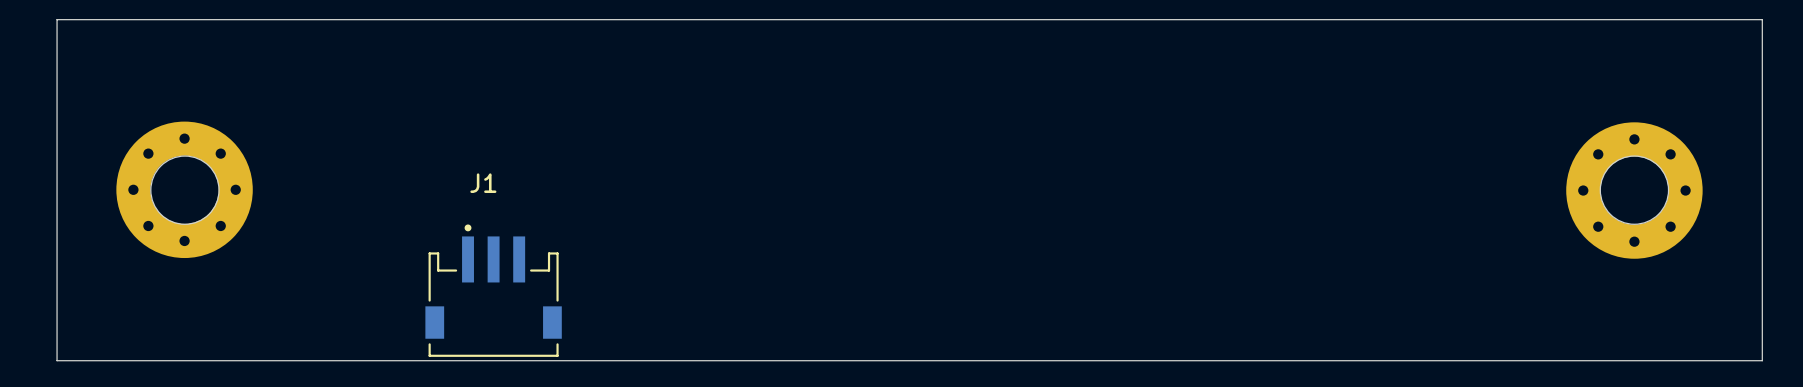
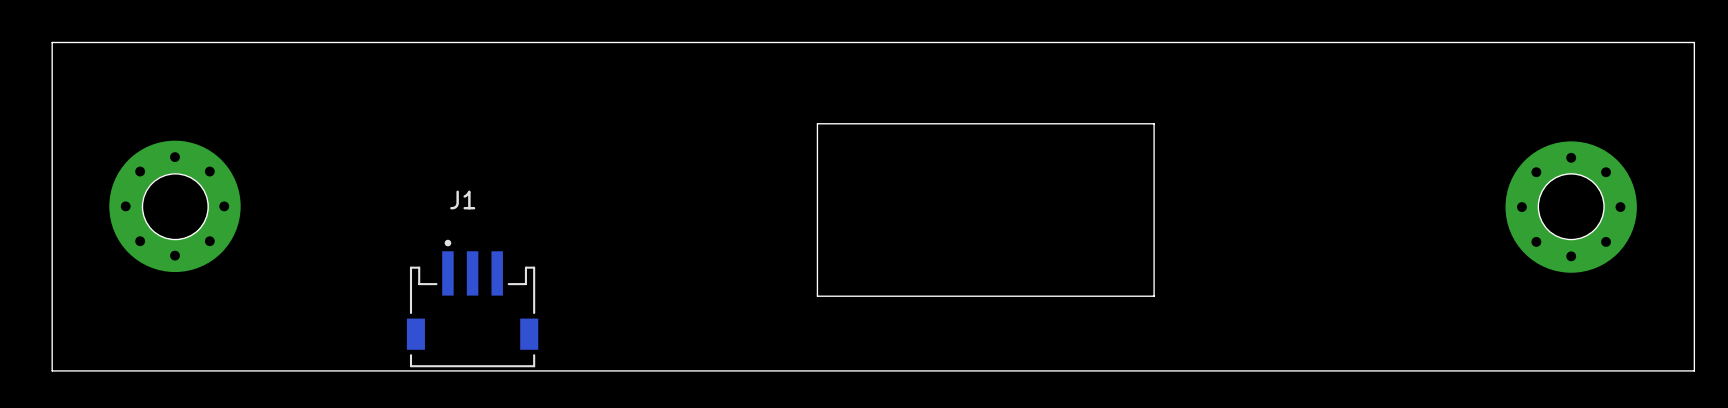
board edge: none -> (1154, 123) (817, 123) (817, 296) (1154, 296) (1154, 123)

